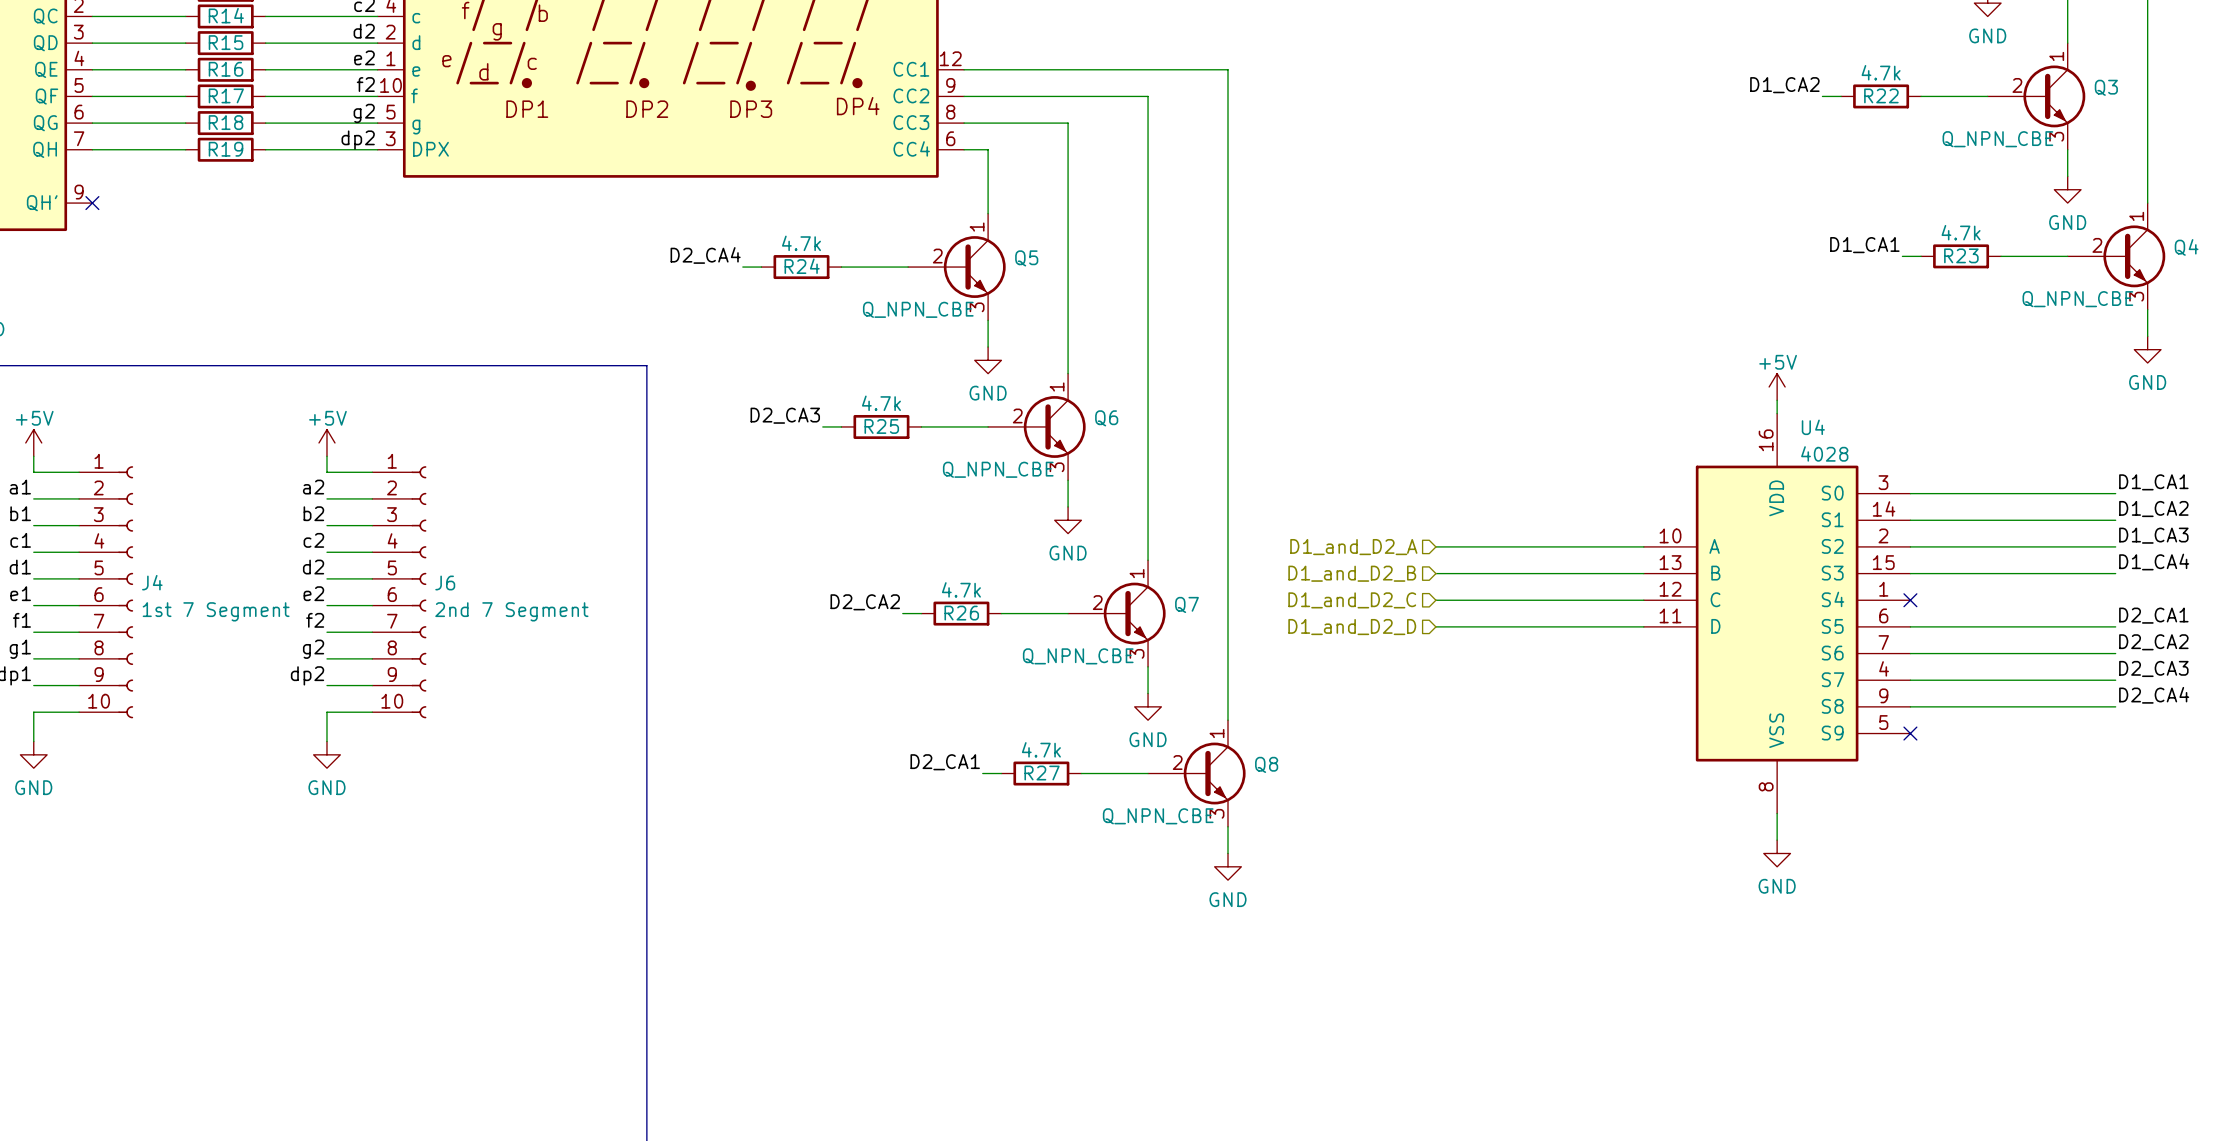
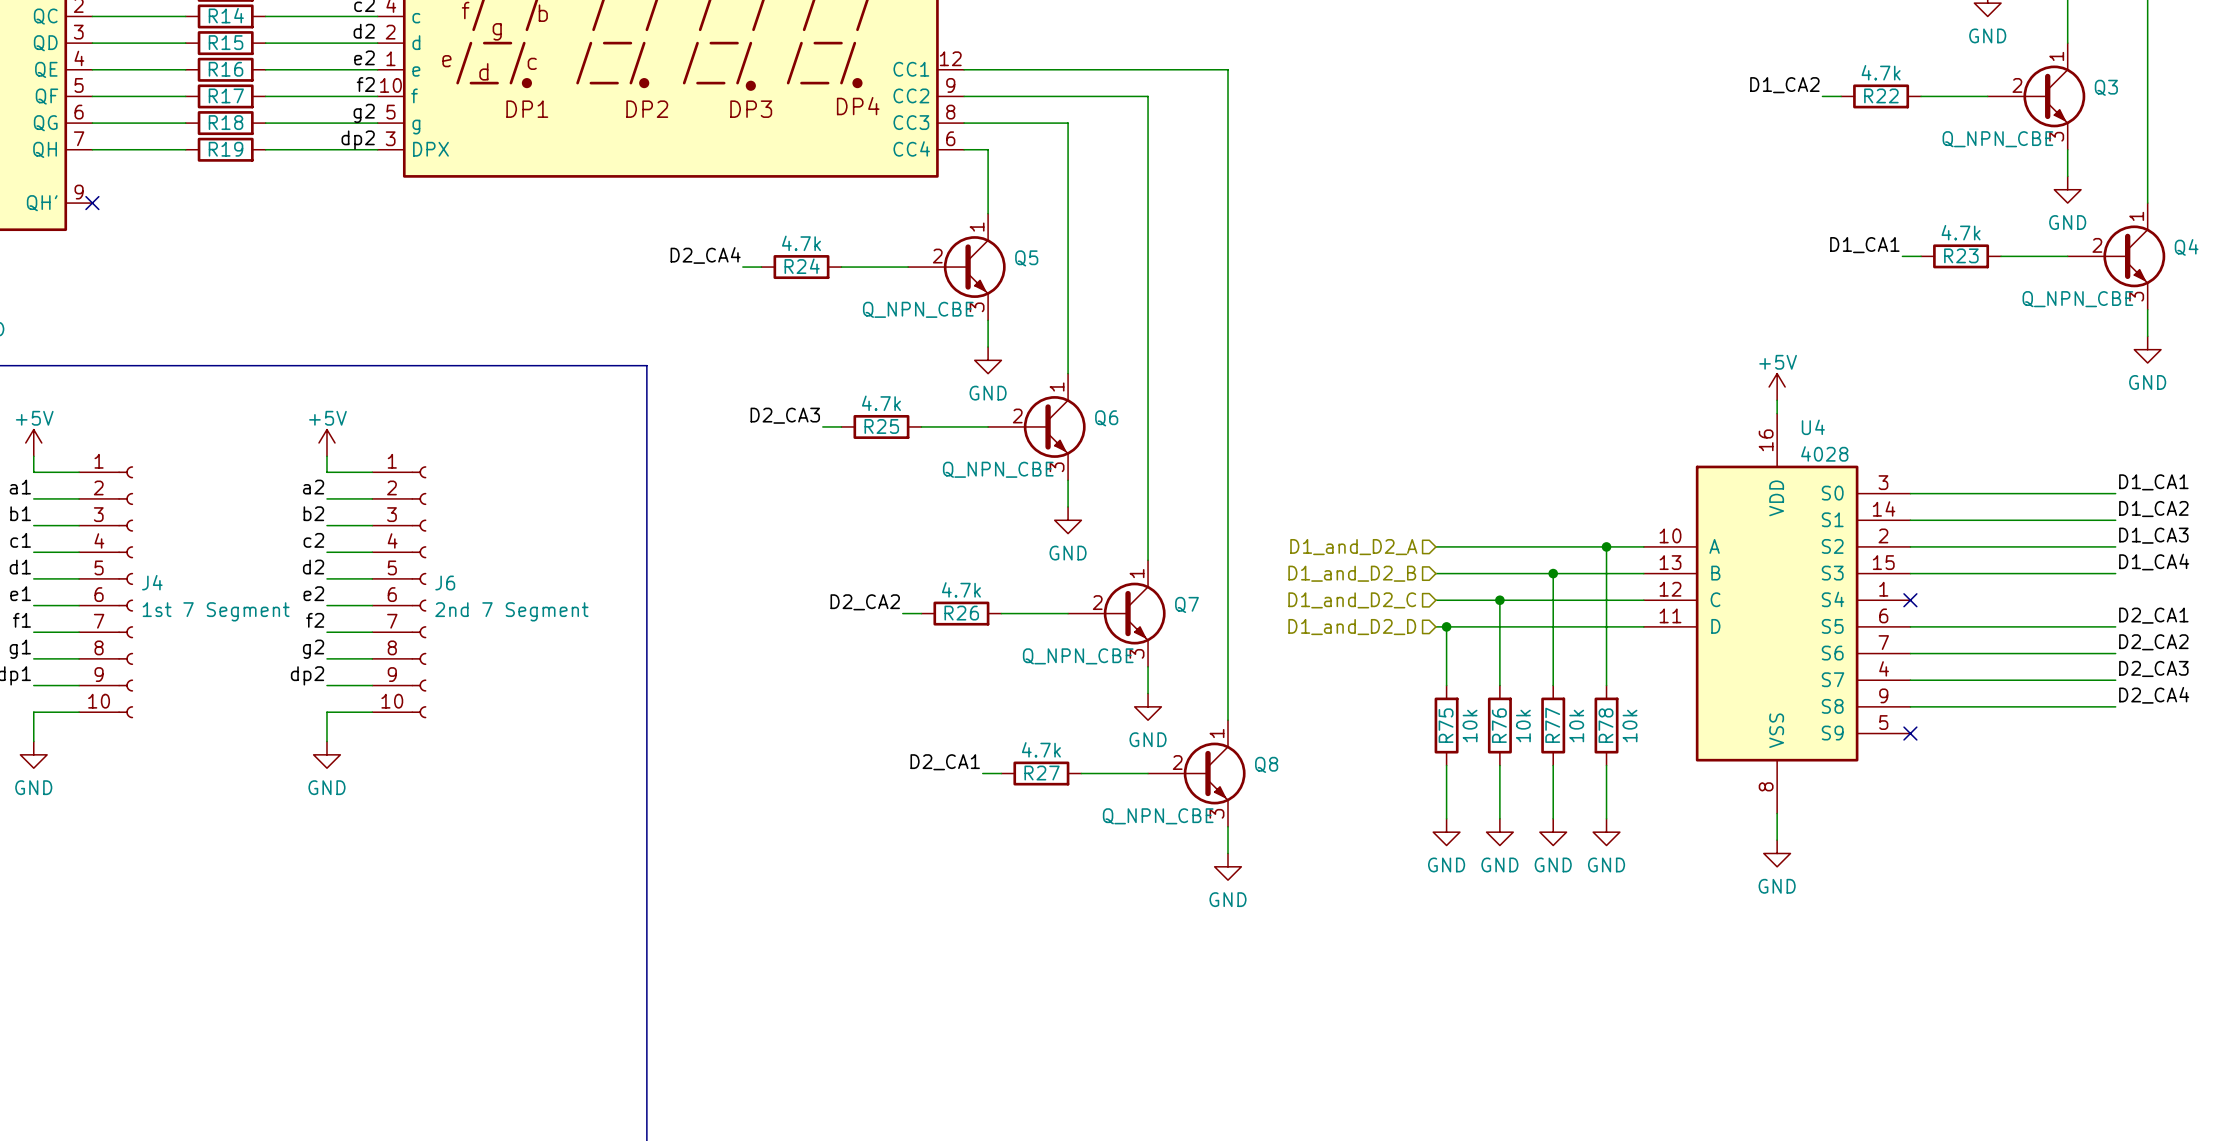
wire: none -> (1606, 546) (1606, 685)
junction: none -> (1606, 546)
wire: none -> (1553, 573) (1553, 685)
junction: none -> (1553, 573)
wire: none -> (1499, 600) (1499, 685)
junction: none -> (1499, 600)
wire: none -> (1446, 626) (1446, 685)
junction: none -> (1446, 626)
R75: none -> 10k (1446, 725)
R76: none -> 10k (1499, 725)
R77: none -> 10k (1553, 725)
R78: none -> 10k (1606, 725)
wire: none -> (1446, 765) (1446, 818)
wire: none -> (1499, 765) (1499, 818)
wire: none -> (1553, 765) (1553, 818)
wire: none -> (1606, 765) (1606, 818)
power symbol: none -> GND (1446, 832)
power symbol: none -> GND (1499, 832)
power symbol: none -> GND (1553, 832)
power symbol: none -> GND (1606, 832)

